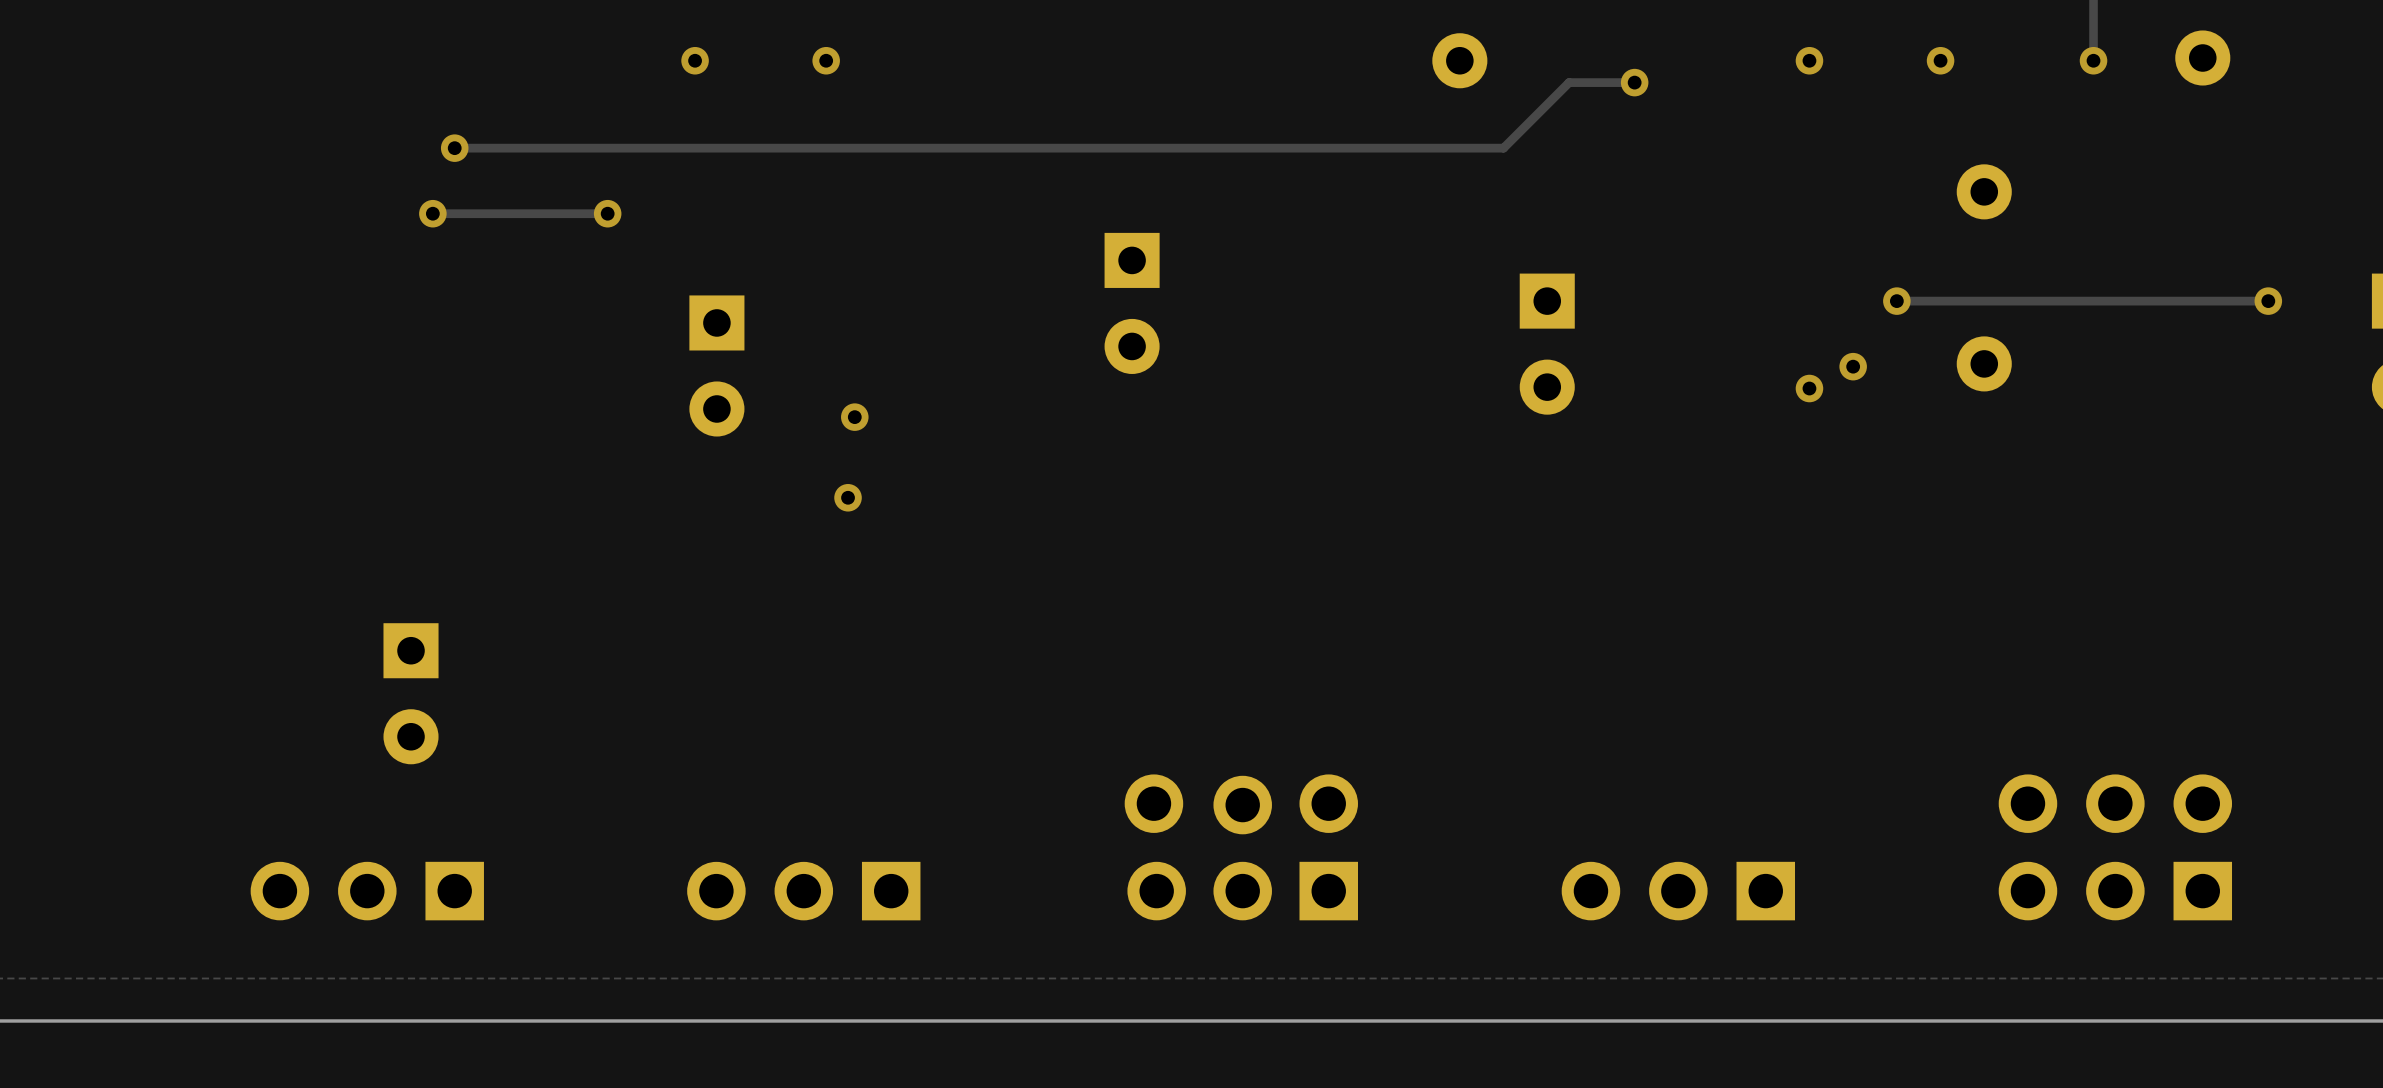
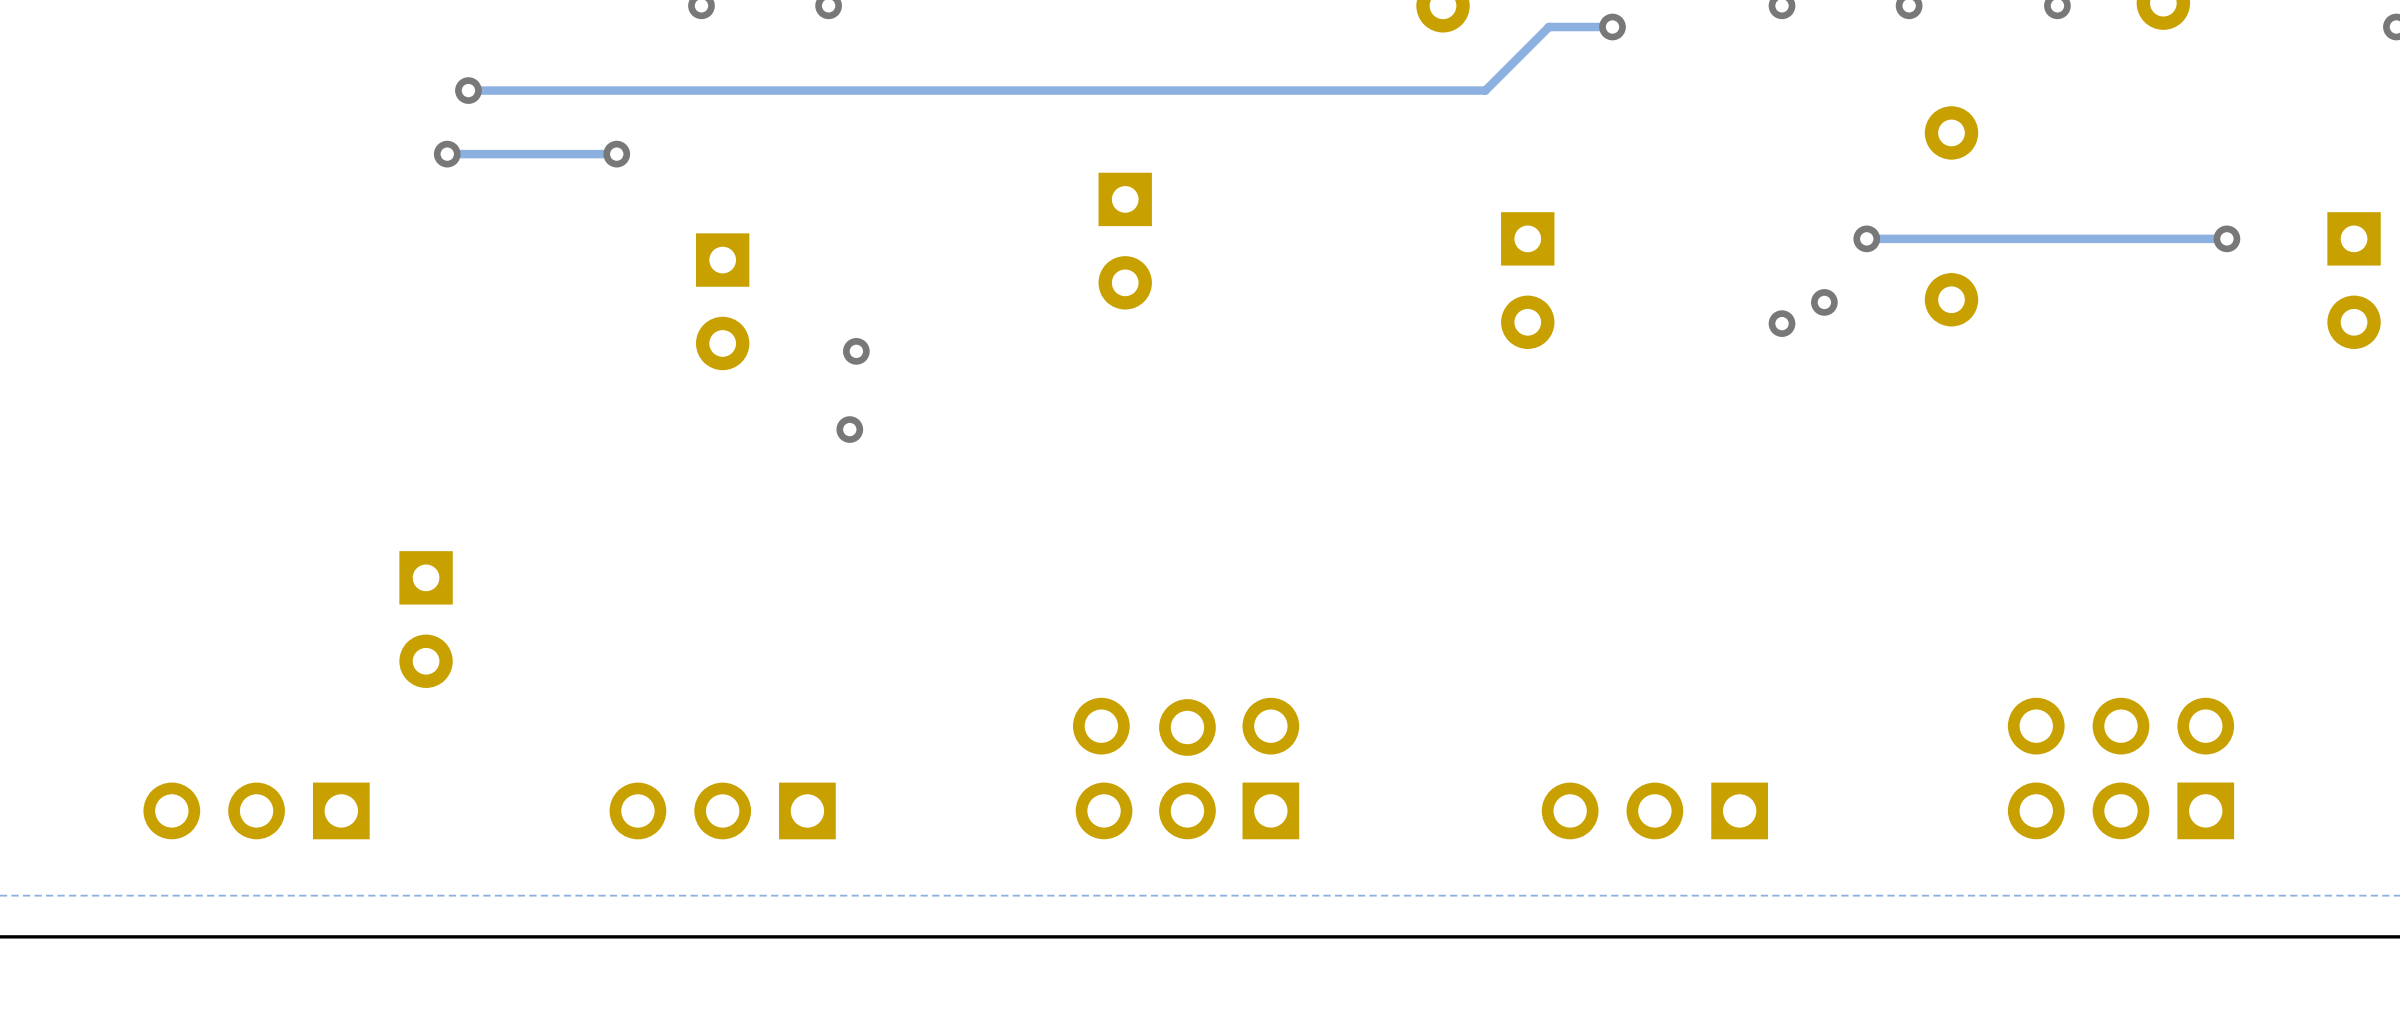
part position: (1241, 847) -> (1186, 768)
part position: (2115, 847) -> (2120, 768)
part position: (367, 891) -> (256, 810)
part position: (803, 891) -> (722, 810)

